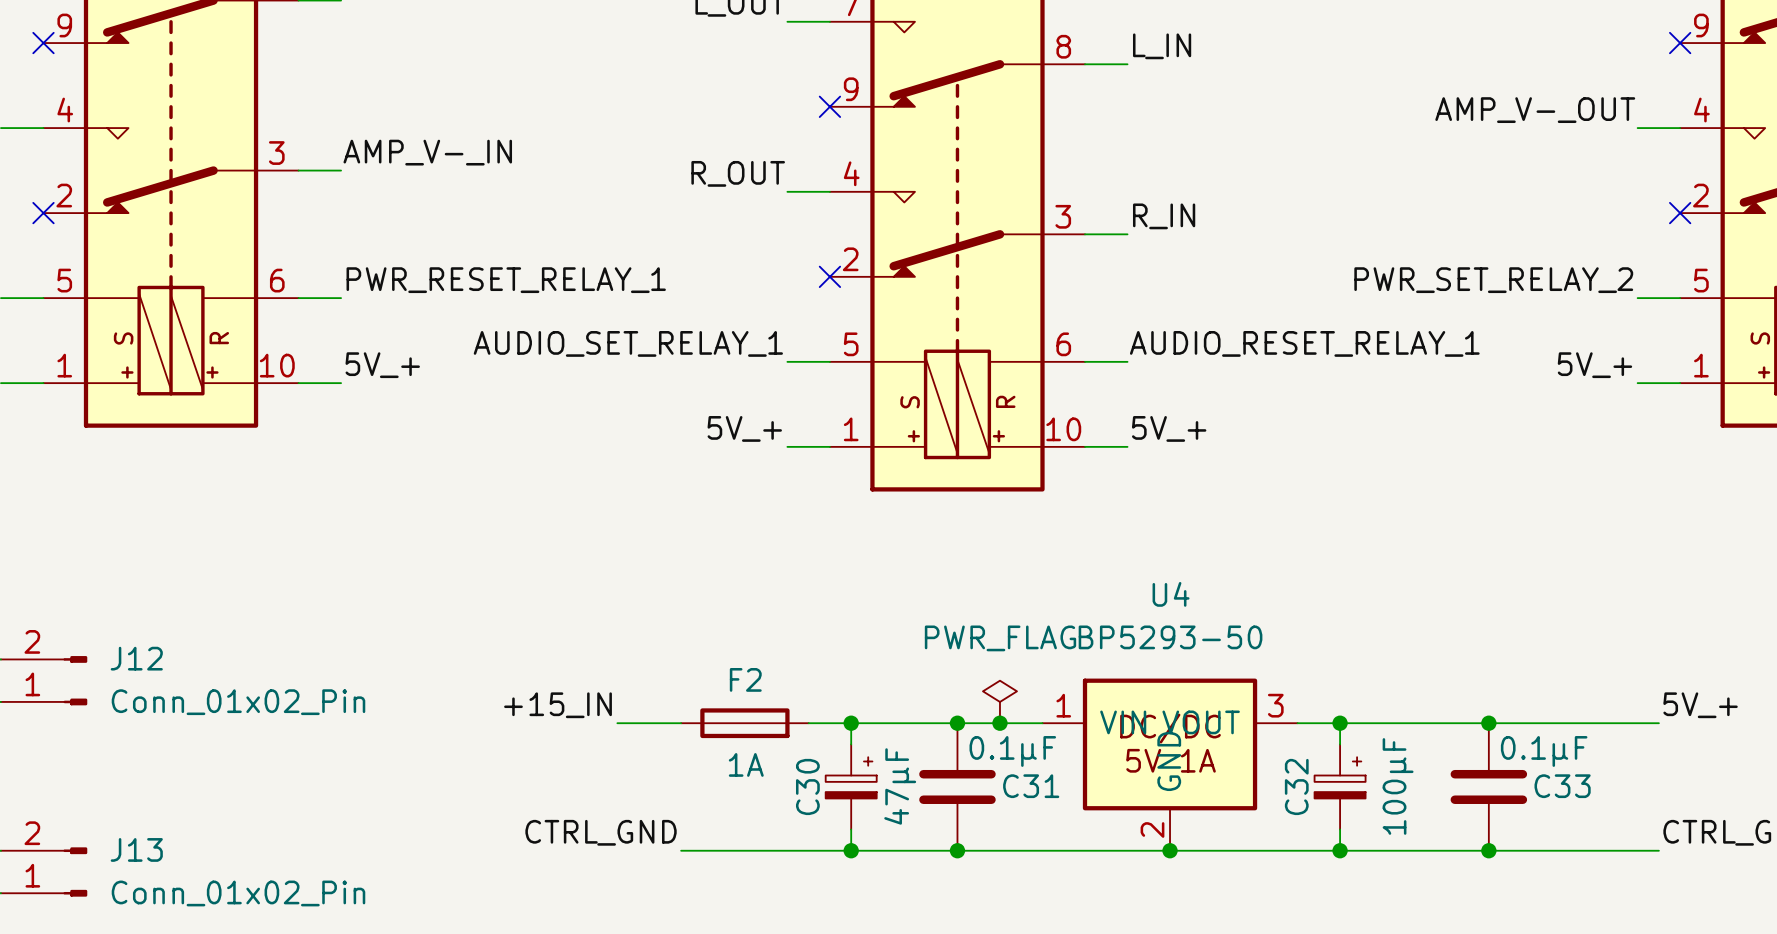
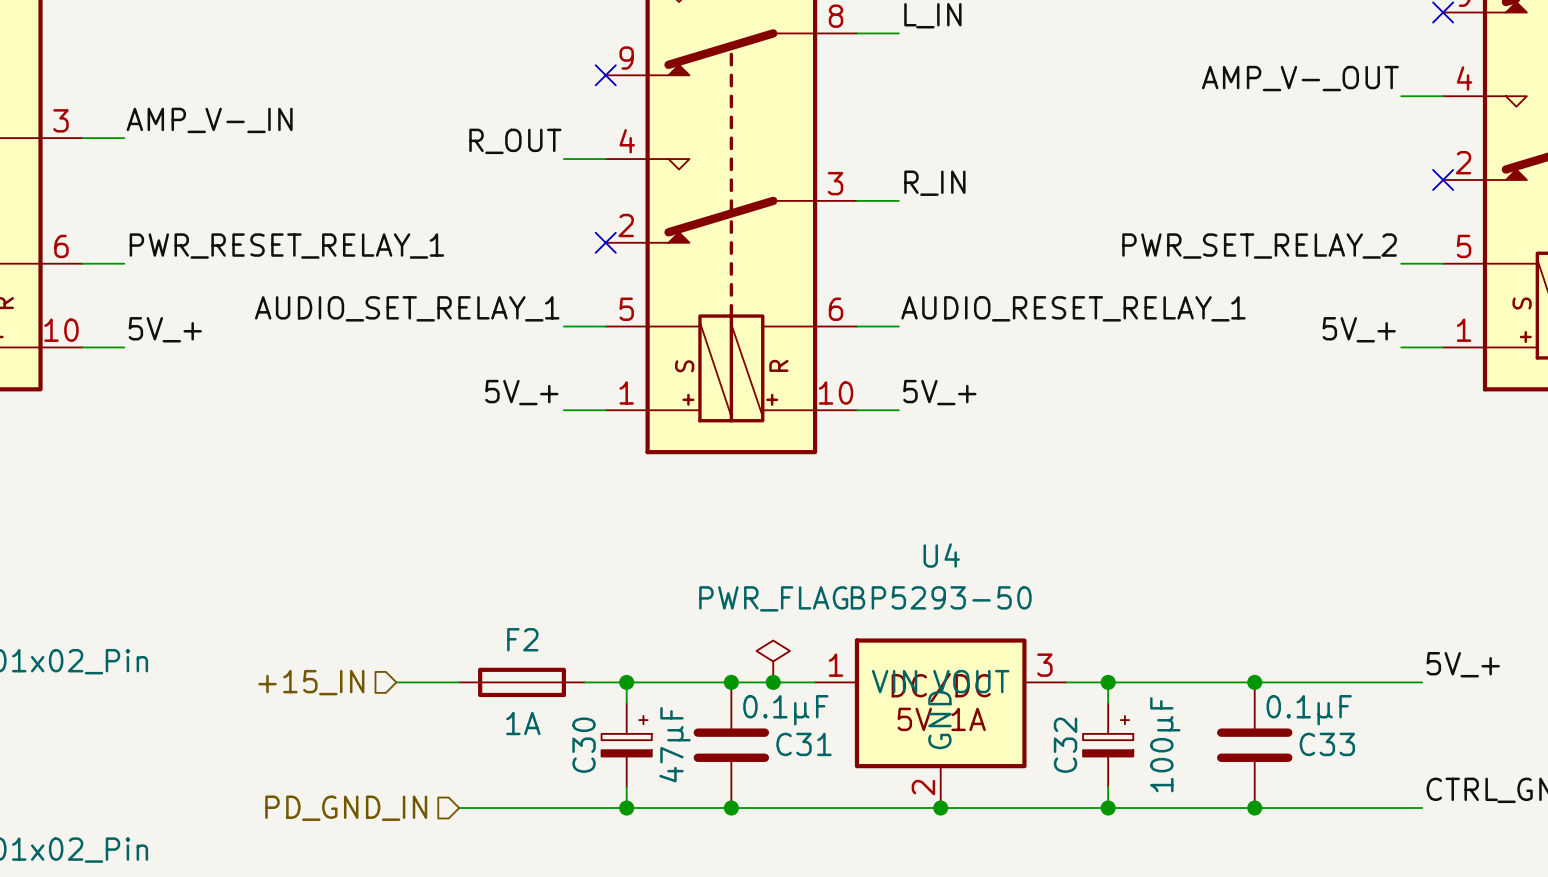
label: +15_IN (558, 705) -> none
hierarchical label: none -> +15_IN (311, 682)
label: CTRL_GND (601, 832) -> none
hierarchical label: none -> PD_GND_IN (346, 808)

